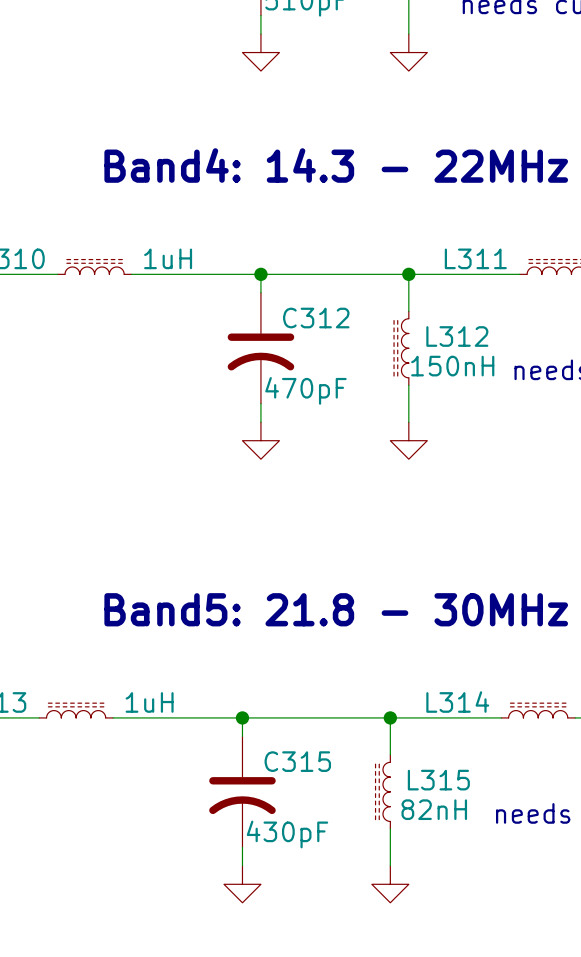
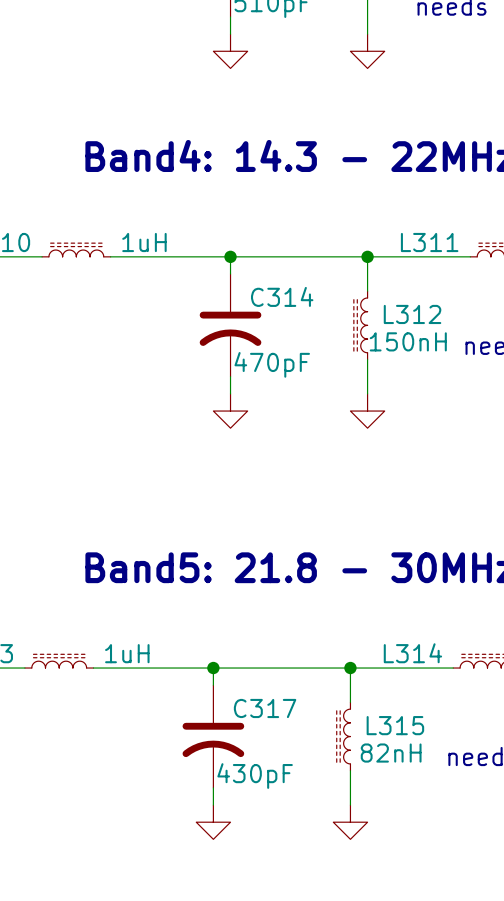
C312 name: C312 (316, 318) -> C314 (282, 296)
C315 name: C315 (297, 761) -> C317 (265, 708)

